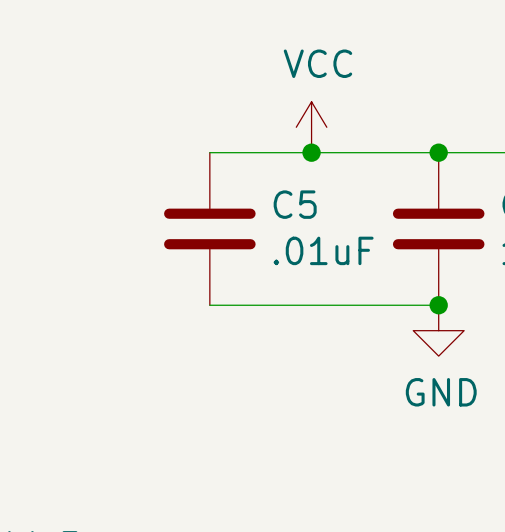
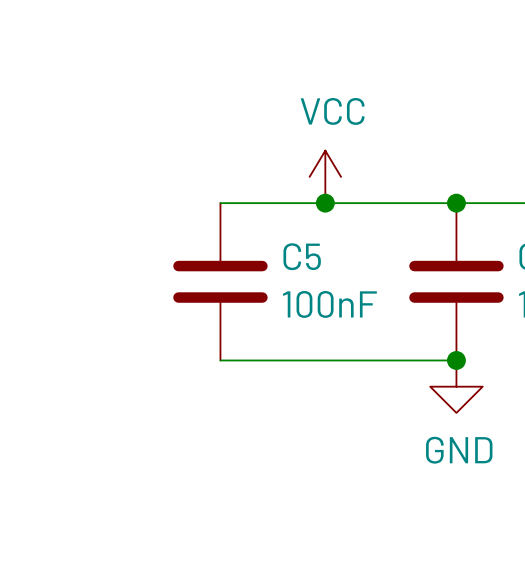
C5 value: .01uF (323, 250) -> 100nF (329, 304)

